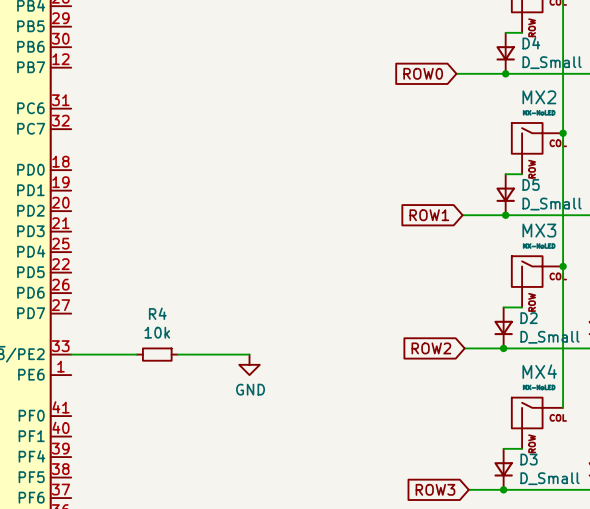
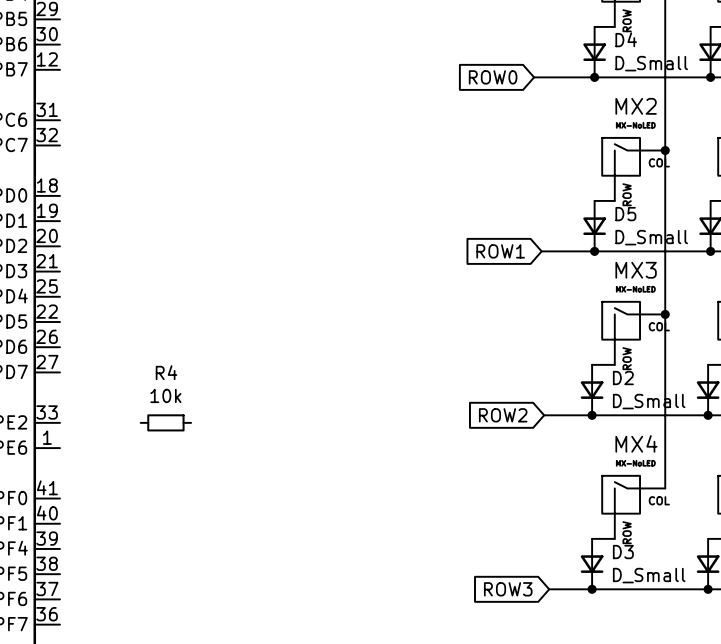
wire: (71, 354) (136, 354) -> none
wire: (177, 354) (249, 354) -> none
power symbol: GND (249, 364) -> none

